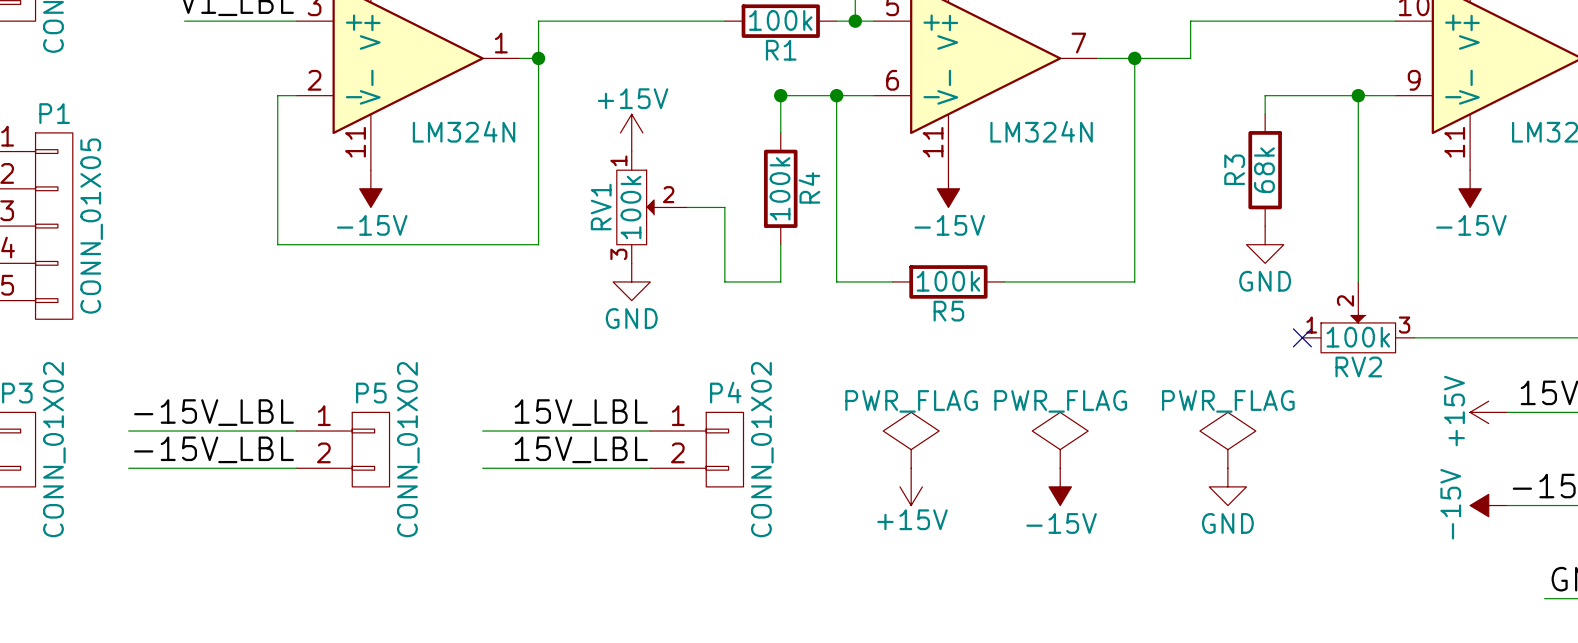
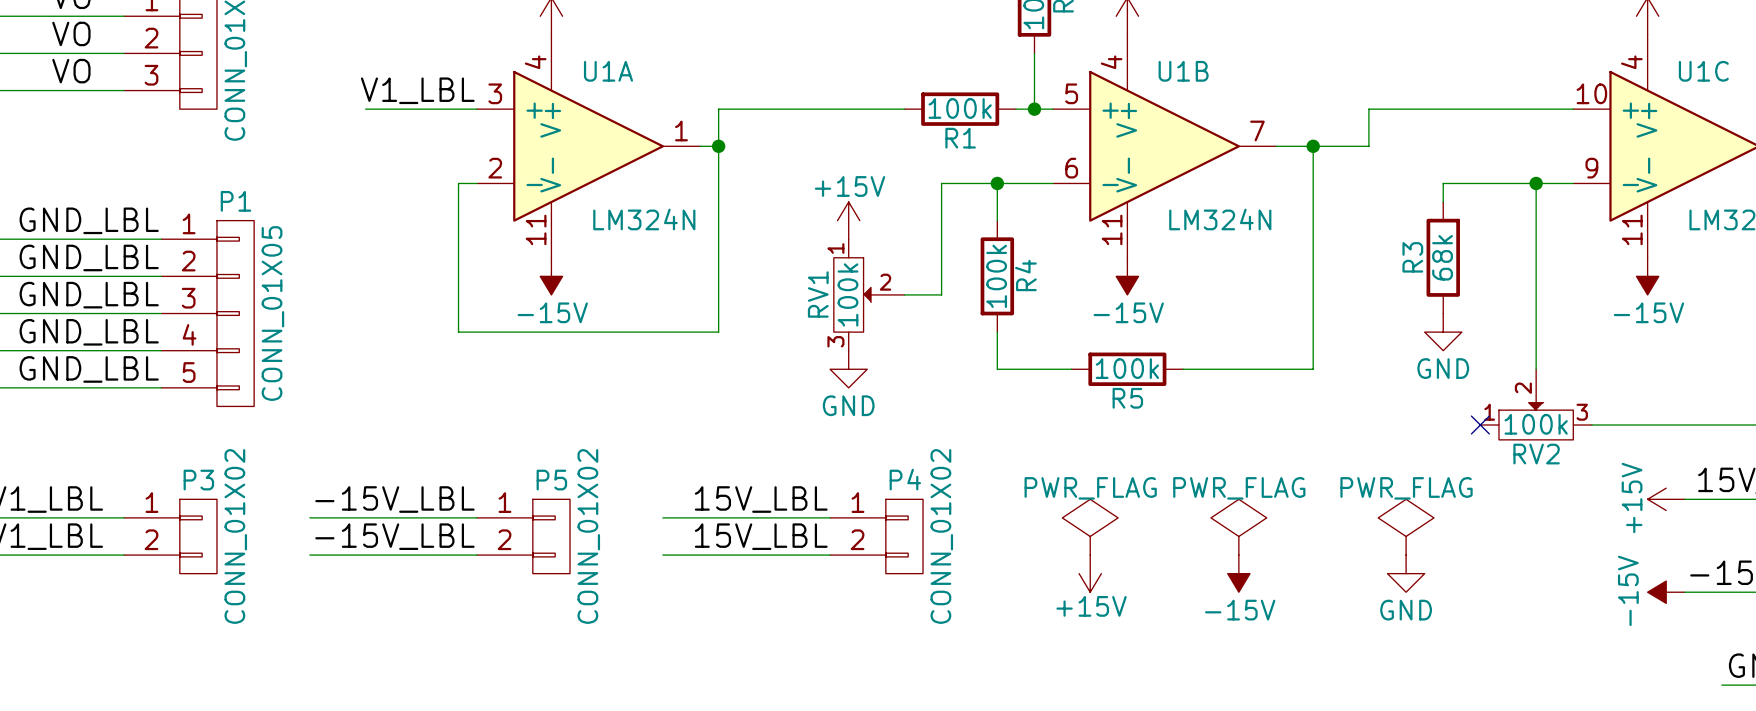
wire: (780, 95) (780, 132) -> (960, 183) (941, 183) (941, 294) (904, 294)
junction: (780, 95) -> none
wire: none -> (997, 183) (997, 220)
junction: none -> (997, 183)
wire: (836, 95) (836, 281) -> (997, 332) (997, 369) (1015, 369)
junction: (836, 95) -> none
power symbol position: +15V (631, 132) -> +15V (848, 220)
R4 position: (780, 188) -> (997, 276)
RV1 position: (652, 207) -> (869, 294)
wire: (687, 207) (724, 207) (724, 281) (780, 281) (780, 244) -> none
power symbol position: GND (631, 281) -> GND (848, 369)

